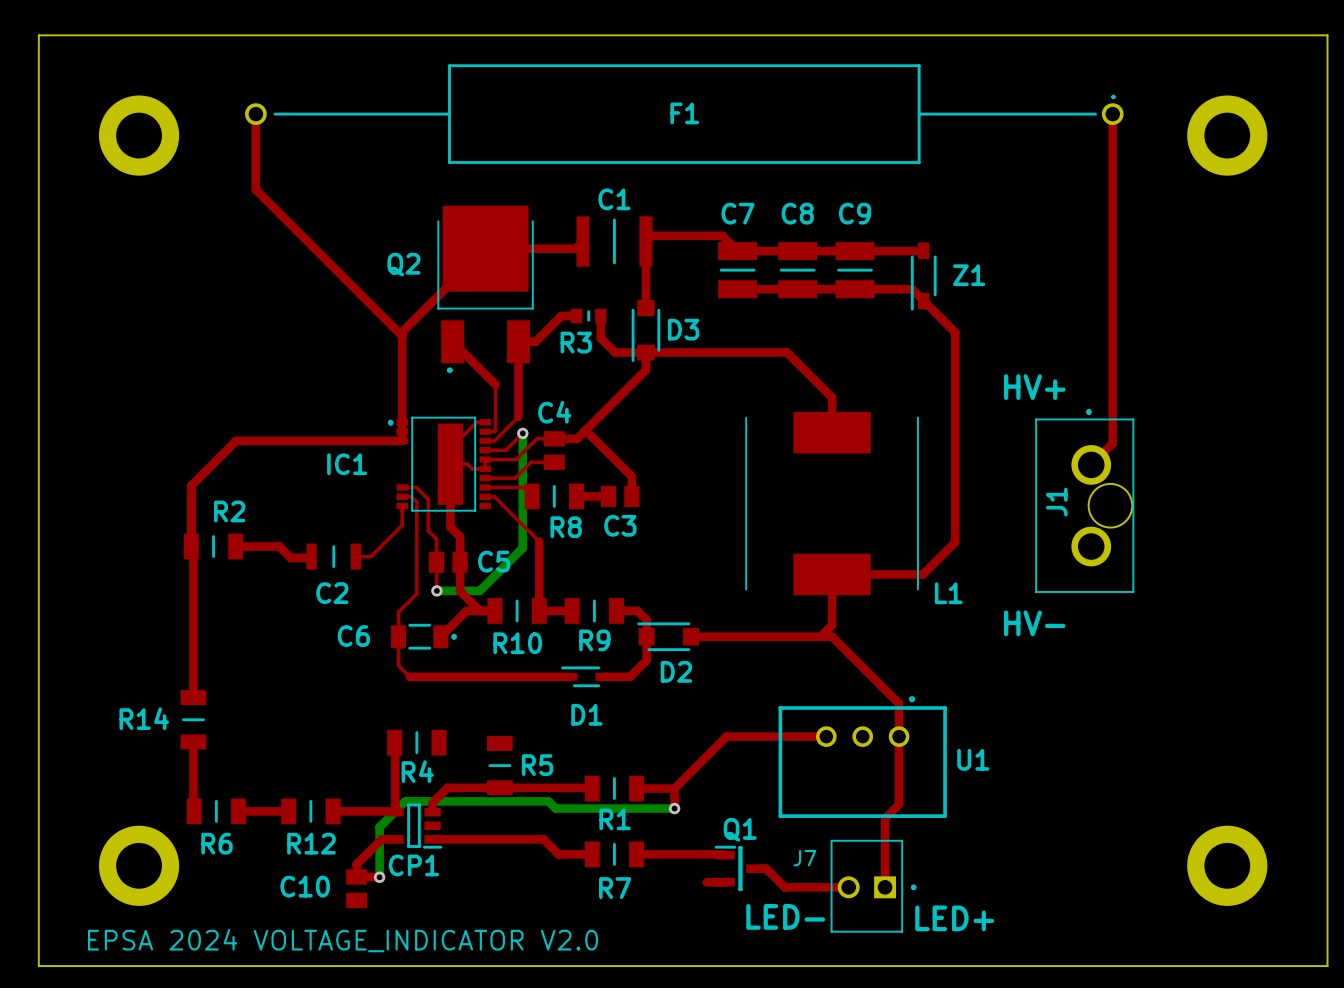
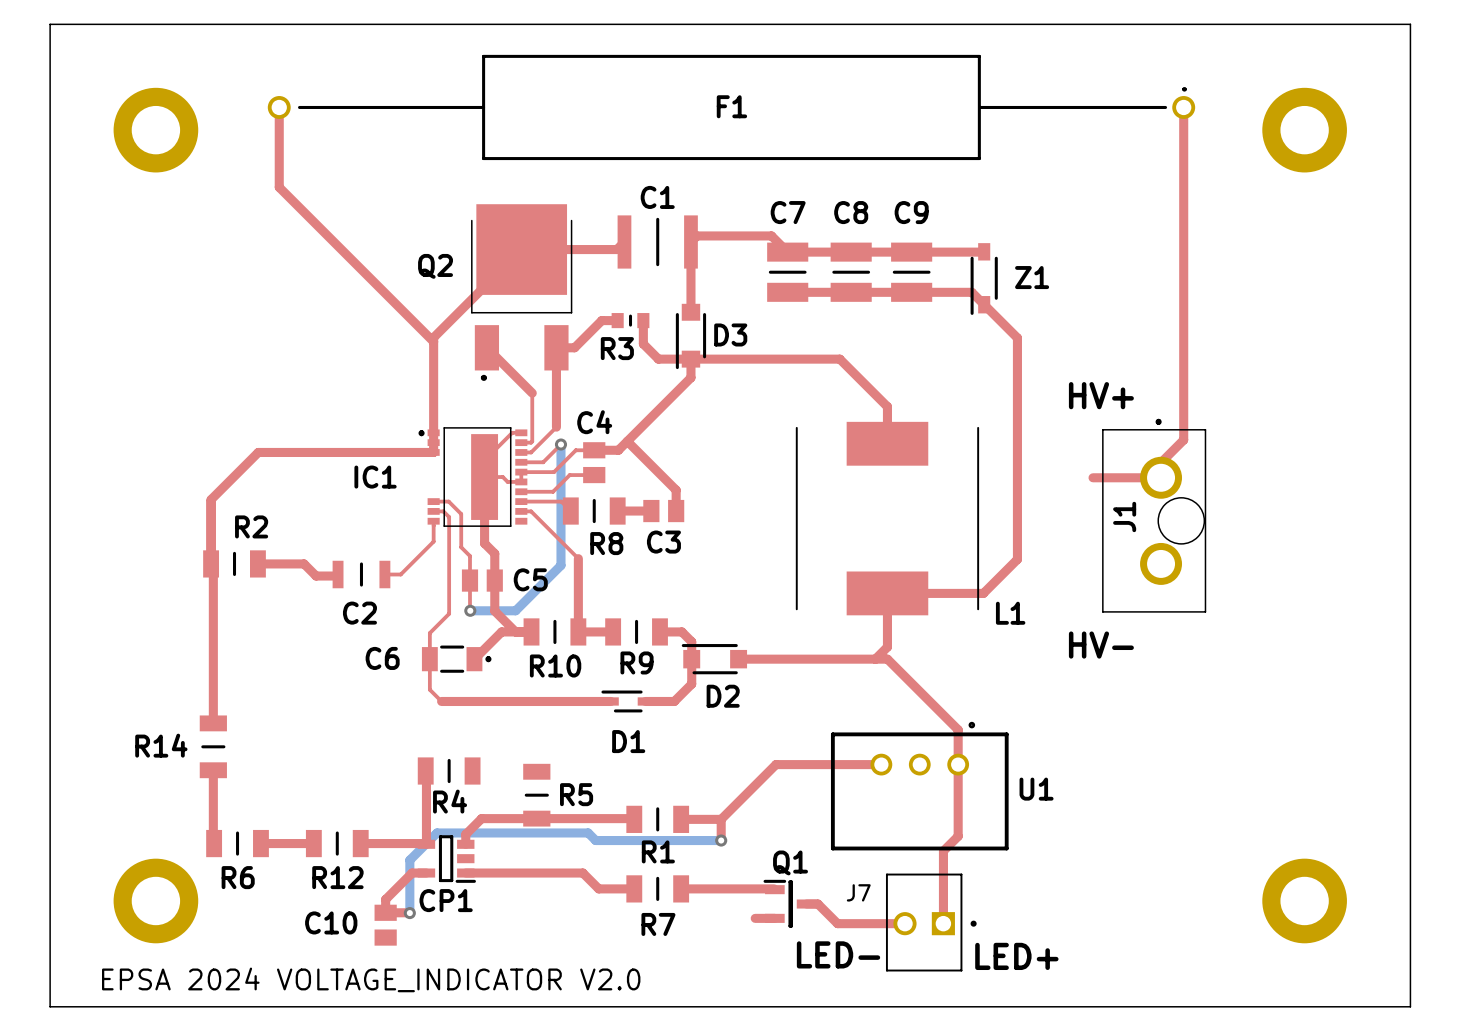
top track: (1112, 429) (1112, 443) (1091, 464) -> (1183, 439) (1145, 477) (1093, 477)

